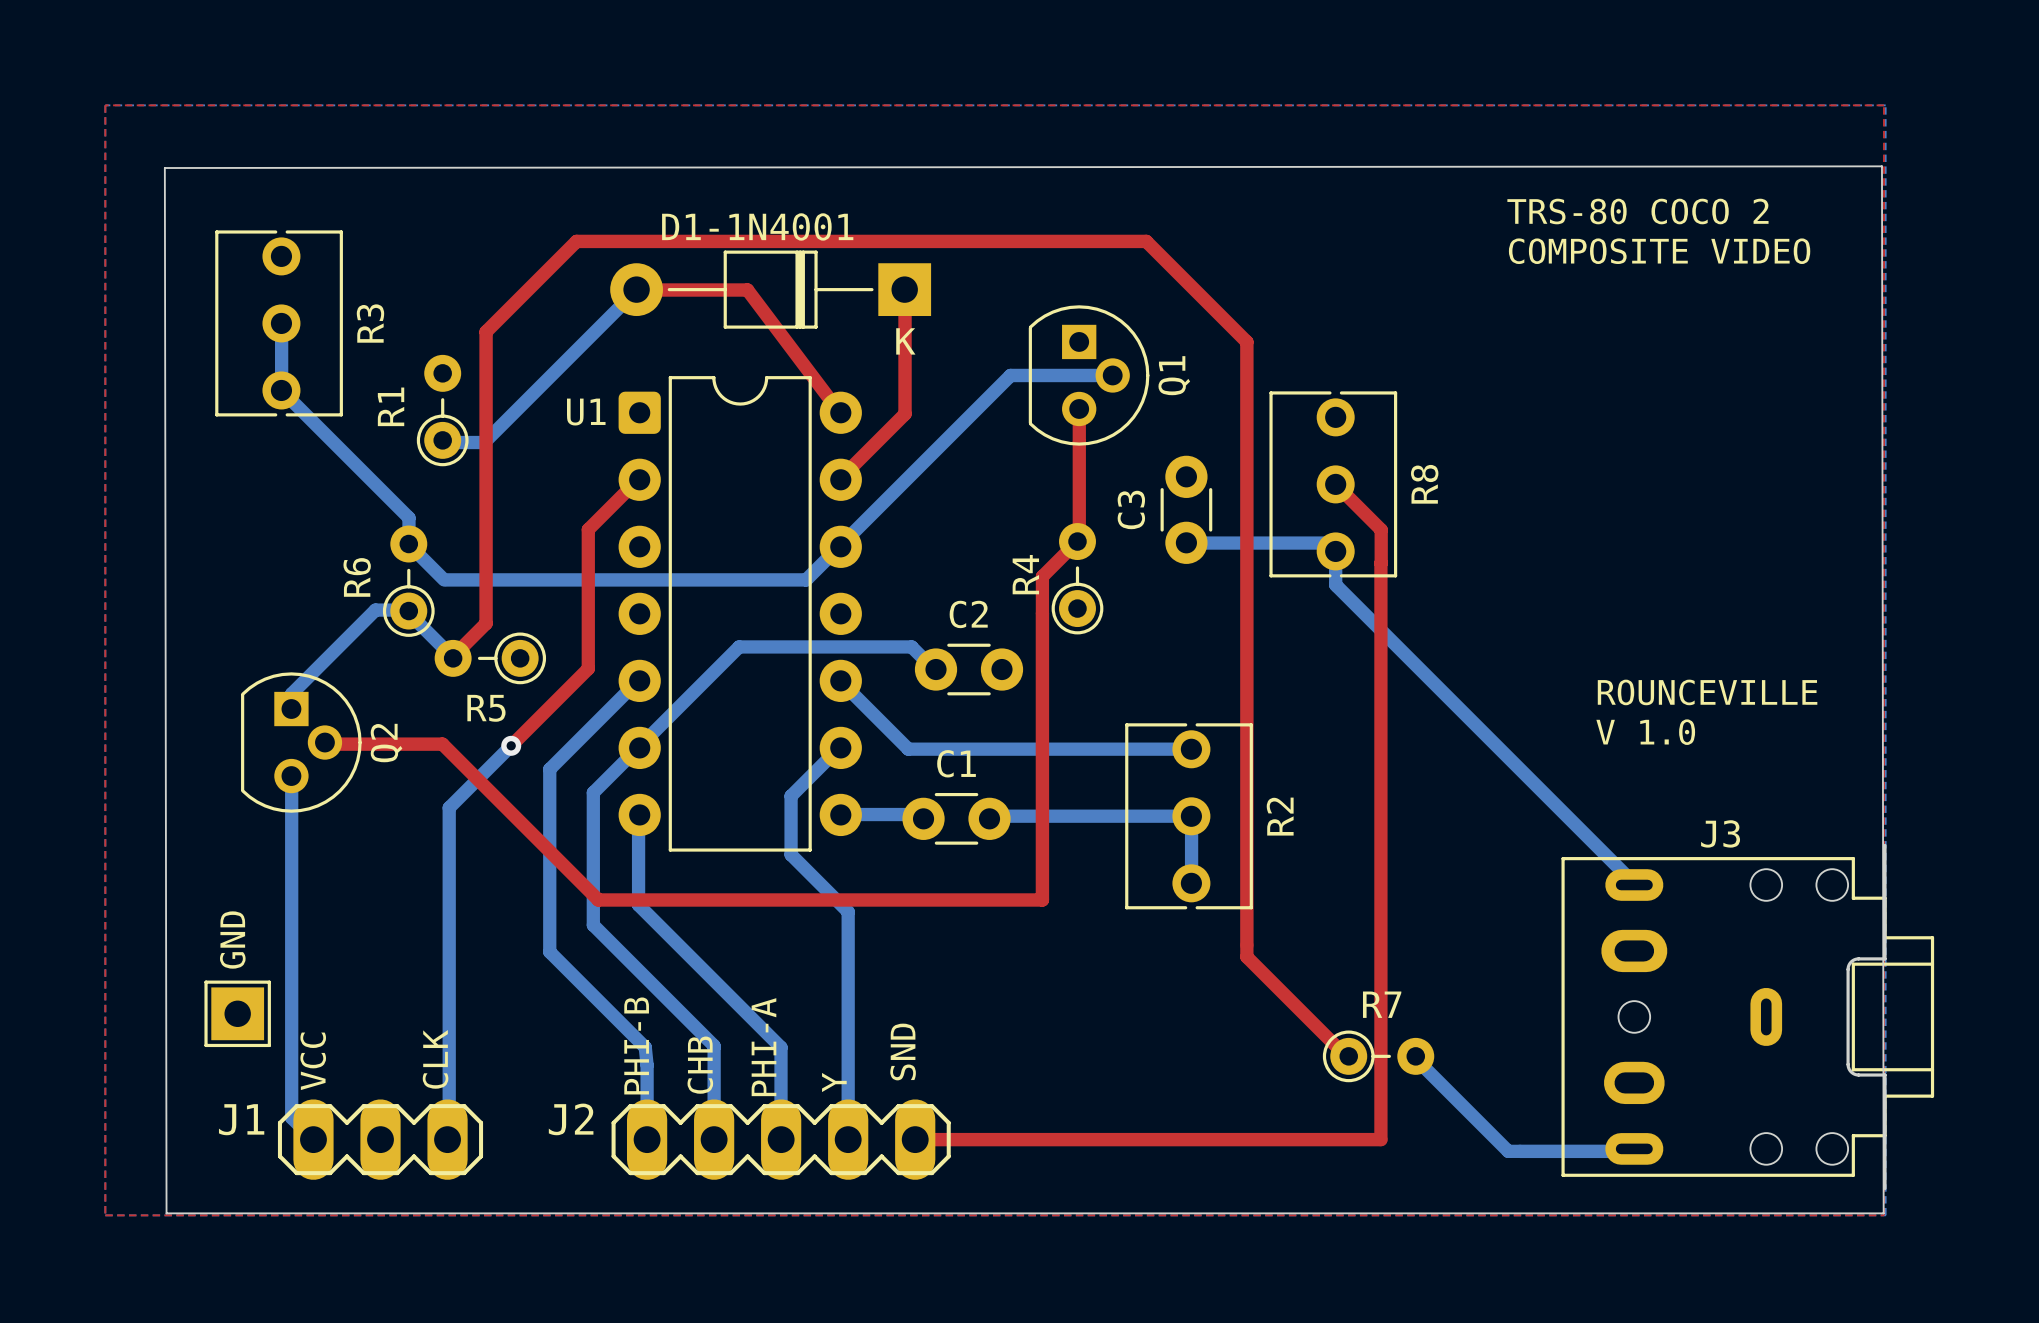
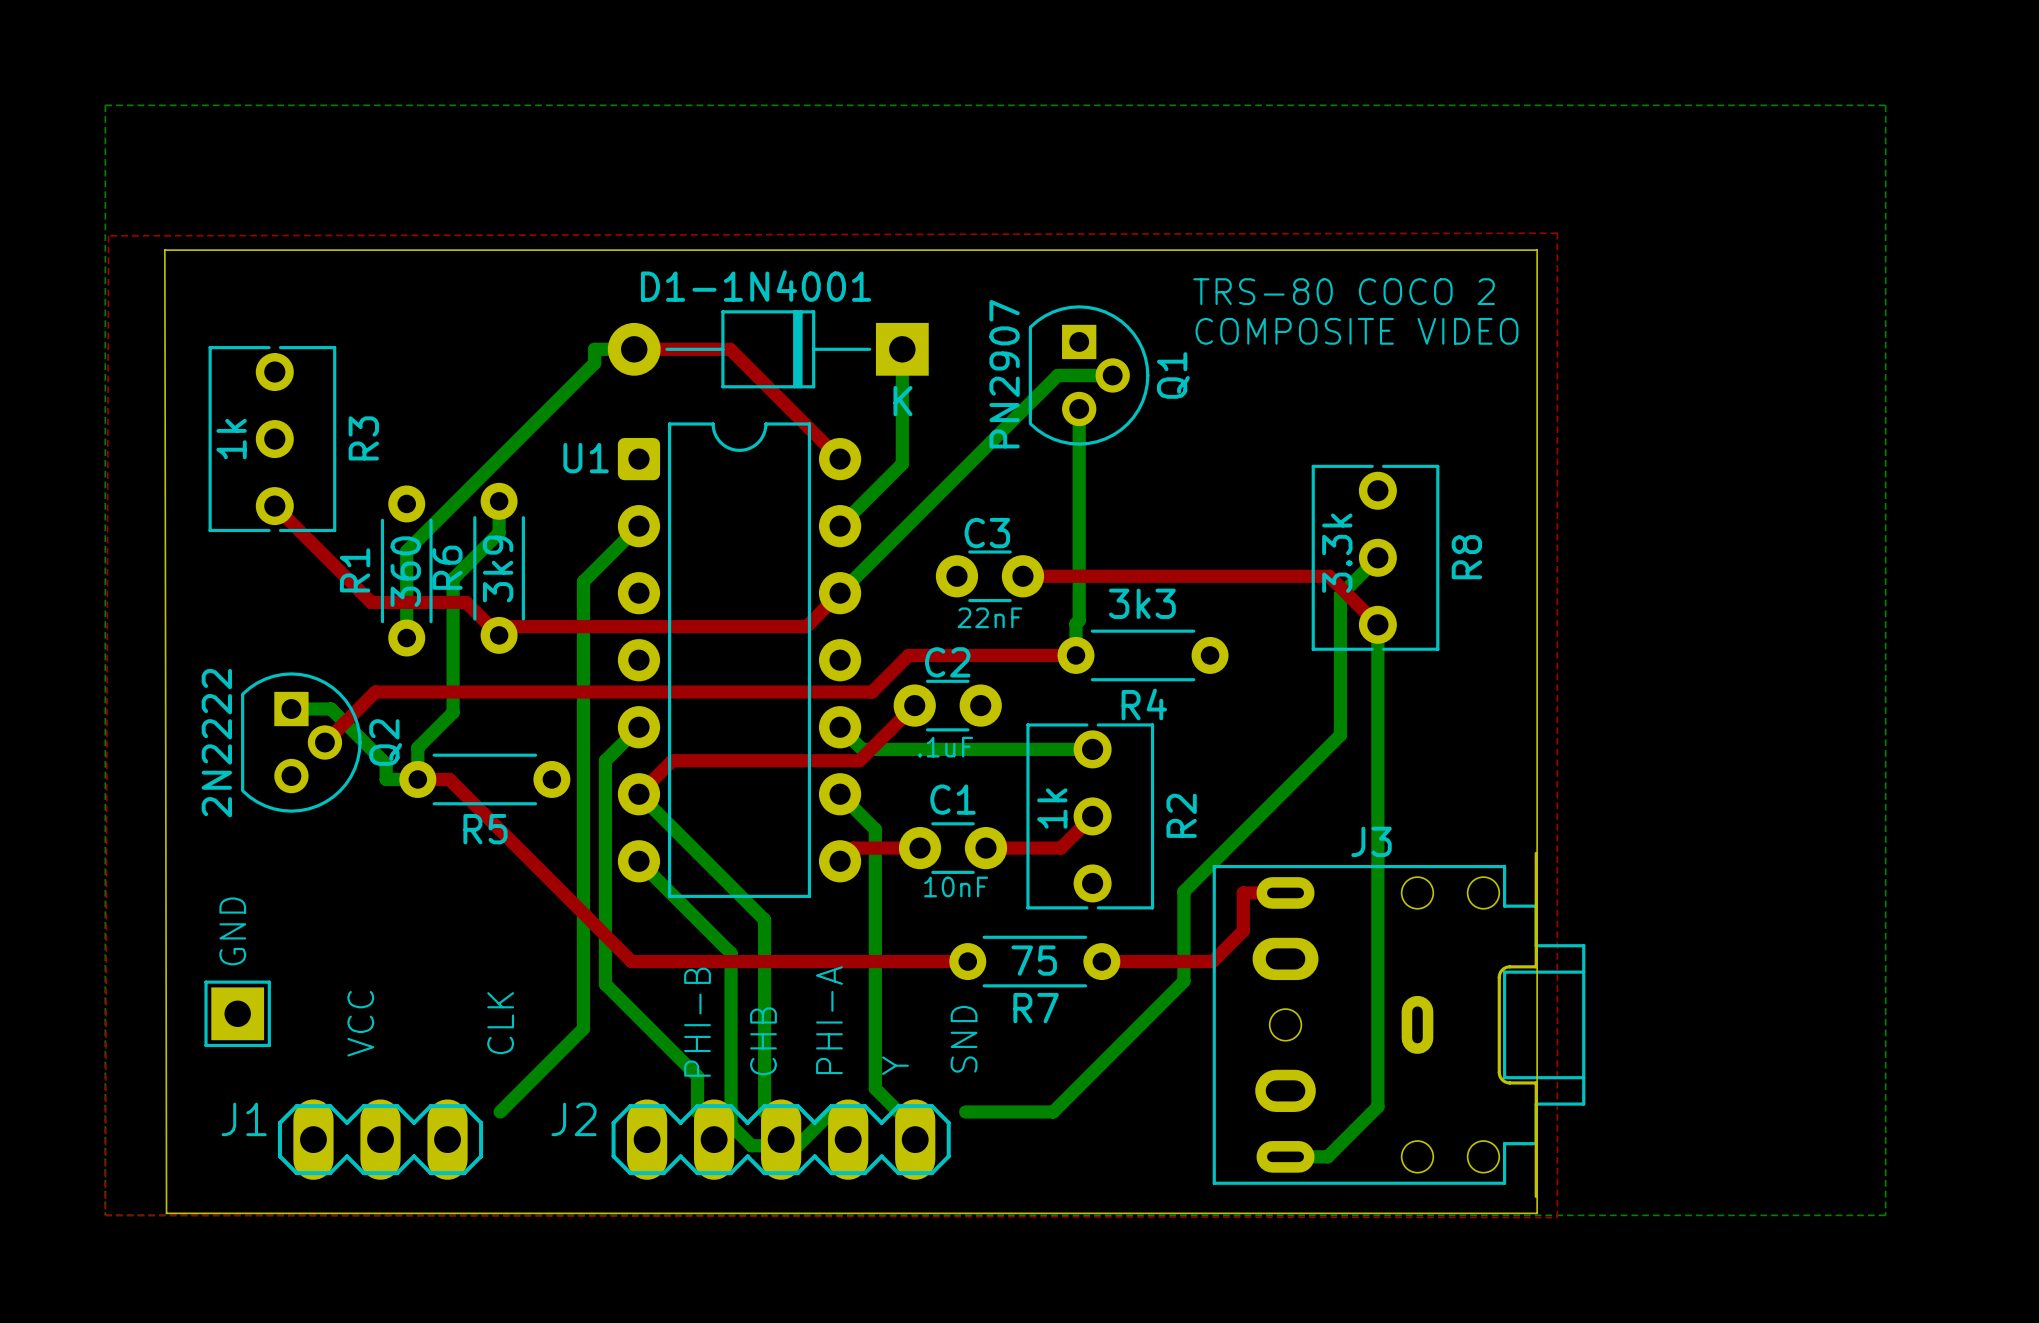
top zone outline: (105, 105) (1883, 105) (1883, 1215) (105, 1215) (105, 105) -> (1557, 233) (108, 235) (105, 1215) (1557, 1217) (1557, 233)
text position: TRS-80 COCO 2 (1637, 211) -> TRS-80 COCO 2 (1344, 291)
text position: COMPOSITE VIDEO (1659, 251) -> COMPOSITE VIDEO (1356, 331)
D1-1N4001 position: (770, 289) -> (768, 349)
bottom track: (636, 290) (484, 442) (444, 442) (442, 440) -> none
top track: (636, 290) (747, 290) (839, 412) -> none
top track: (905, 290) (905, 414) (839, 479) -> none
R3 position: (279, 323) -> (272, 439)
bottom track: (281, 323) (281, 390) (408, 517) (408, 544) (444, 579) (806, 579) (1010, 375) (1057, 375) -> (840, 593) (1057, 375)
bottom track: none -> (634, 349) (594, 349) (594, 363) (406, 551) (406, 638)
top track: none -> (634, 349) (730, 349) (840, 459)
bottom track: none -> (902, 349) (902, 463) (840, 526)
R1 footprint: [416, 354, 469, 467] -> [380, 485, 433, 657]
Q1 value: none -> PN2907 (1004, 374)
bottom track: none -> (1079, 408) (1079, 620) (1075, 623) (1075, 655)
top track: (1079, 411) (1079, 539) (1042, 576) (1042, 899) (598, 899) (442, 744) (326, 744) (324, 742) -> (1075, 655) (908, 655) (872, 692) (375, 692) (324, 742)
R3 value: none -> 1k (231, 439)
top track: (638, 479) (588, 529) (588, 668) (511, 745) -> none
R8 position: (1333, 484) -> (1375, 557)
top track: (1335, 484) (1381, 529) (1381, 563) -> none
bottom track: none -> (499, 501) (499, 532) (453, 579) (453, 712) (417, 747) (417, 779) (386, 779) (386, 764) (331, 709) (291, 709)
top track: none -> (274, 506) (371, 602) (466, 602) (499, 635) (507, 626) (806, 626) (840, 593)
C3 rotation: 0° (1186, 509) -> 90° clockwise (989, 576)
C3 position: (1186, 509) -> (989, 576)
R4 footprint: [1051, 523, 1104, 635] -> [1057, 629, 1229, 682]
R6 footprint: [382, 525, 435, 637] -> [473, 482, 525, 654]
bottom track: none -> (638, 526) (583, 581) (583, 1028) (500, 1111)
bottom track: (1186, 543) (1327, 543) (1335, 551) (1335, 584) (1633, 883) -> none
R8 value: none -> 3.3k (1337, 553)
bottom track: none -> (1377, 557) (1340, 595) (1340, 735) (1183, 891) (1183, 981) (1053, 1111) (965, 1111)
top track: (1380, 563) (1380, 1139) (915, 1139) -> none
R6 value: none -> 3k9 (498, 568)
R1 value: none -> 360 (405, 571)
R4 name position: R4 (1025, 574) -> R4 (1144, 704)
top track: none -> (1022, 576) (1329, 576) (1377, 624)
R4 value: none -> 3k3 (1142, 603)
U1 position: (740, 613) -> (739, 660)
C2 name position: C2 (968, 614) -> C2 (947, 662)
C3 value: none -> 22nF (989, 617)
bottom track: none -> (1377, 624) (1377, 1106) (1327, 1156) (1285, 1156)
R5 footprint: [434, 632, 547, 685] -> [399, 753, 571, 806]
bottom track: (452, 657) (408, 613) (410, 611) (408, 610) (375, 610) (291, 693) (291, 710) -> none
top track: (452, 657) (486, 623) (486, 331) (576, 241) (1146, 241) (1246, 341) (1246, 956) (1347, 1057) -> none
C2 position: (969, 669) -> (947, 705)
bottom track: (935, 670) (911, 646) (739, 646) (593, 792) (593, 925) (713, 1045) (714, 1139) -> none
bottom track: (638, 680) (549, 769) (549, 951) (645, 1047) (647, 1139) -> none
bottom track: (839, 680) (908, 749) (1191, 749) -> none
text: ROUNCEVILLE (1707, 692) -> none
top track: none -> (914, 705) (859, 760) (672, 760) (638, 794)
bottom track: none -> (638, 727) (605, 760) (605, 984) (697, 1076) (697, 1111)
bottom track: none -> (840, 727) (862, 749) (1092, 749)
text: V 1.0 (1645, 732) -> none
Q2 value: none -> 2N2222 (216, 743)
bottom track: (511, 745) (449, 807) (449, 1136) -> none
via: (511, 745) -> none
bottom track: (839, 747) (791, 796) (791, 854) (848, 911) (848, 1139) -> none
C2 value: none -> .1uF (945, 747)
C1 name position: C1 (956, 763) -> C1 (953, 799)
bottom track: (291, 777) (291, 1117) (313, 1139) -> none
top track: none -> (417, 779) (449, 779) (631, 961) (967, 961)
bottom track: none -> (638, 794) (764, 919) (764, 1111)
bottom track: none -> (840, 794) (875, 829) (875, 1088) (898, 1111)
R2 value: none -> 1k (1052, 808)
bottom track: (638, 814) (638, 905) (781, 1047) (781, 1139) -> none
bottom track: (839, 814) (916, 814) (925, 816) -> none
bottom track: (992, 816) (1191, 816) (1191, 883) -> none
top track: none -> (1092, 816) (1060, 848) (986, 848)
R2 position: (1189, 816) -> (1090, 816)
C1 position: (956, 818) -> (953, 848)
top track: none -> (920, 848) (853, 848) (840, 861)
bottom track: none -> (638, 861) (731, 953) (731, 1125) (751, 1145) (797, 1145) (831, 1111)
C1 value: none -> 10nF (956, 886)
top track: none -> (1285, 892) (1243, 892) (1243, 930) (1212, 961) (1101, 961)
R7 value: none -> 75 (1034, 960)
R7 name position: R7 (1382, 1004) -> R7 (1036, 1008)
J3 position: (1747, 1016) -> (1399, 1024)
R7 footprint: [1322, 1030, 1435, 1083] -> [949, 935, 1121, 988]
text position: PHI-B (636, 1045) -> PHI-B (697, 1022)
text position: PHI-A (763, 1047) -> PHI-A (829, 1020)
text position: SND (903, 1051) -> SND (964, 1039)
bottom track: (1414, 1057) (1508, 1151) (1633, 1151) -> none
text position: CLK (435, 1059) -> CLK (500, 1023)
text position: VCC (313, 1061) -> VCC (360, 1023)
text position: CHB (700, 1065) -> CHB (763, 1041)
text position: Y (834, 1082) -> Y (895, 1065)
board edge: (166, 1213) (164, 168) (1881, 166) (1883, 1213) (1537, 1213) -> (166, 1213) (164, 250) (1537, 250) (1537, 1213)

